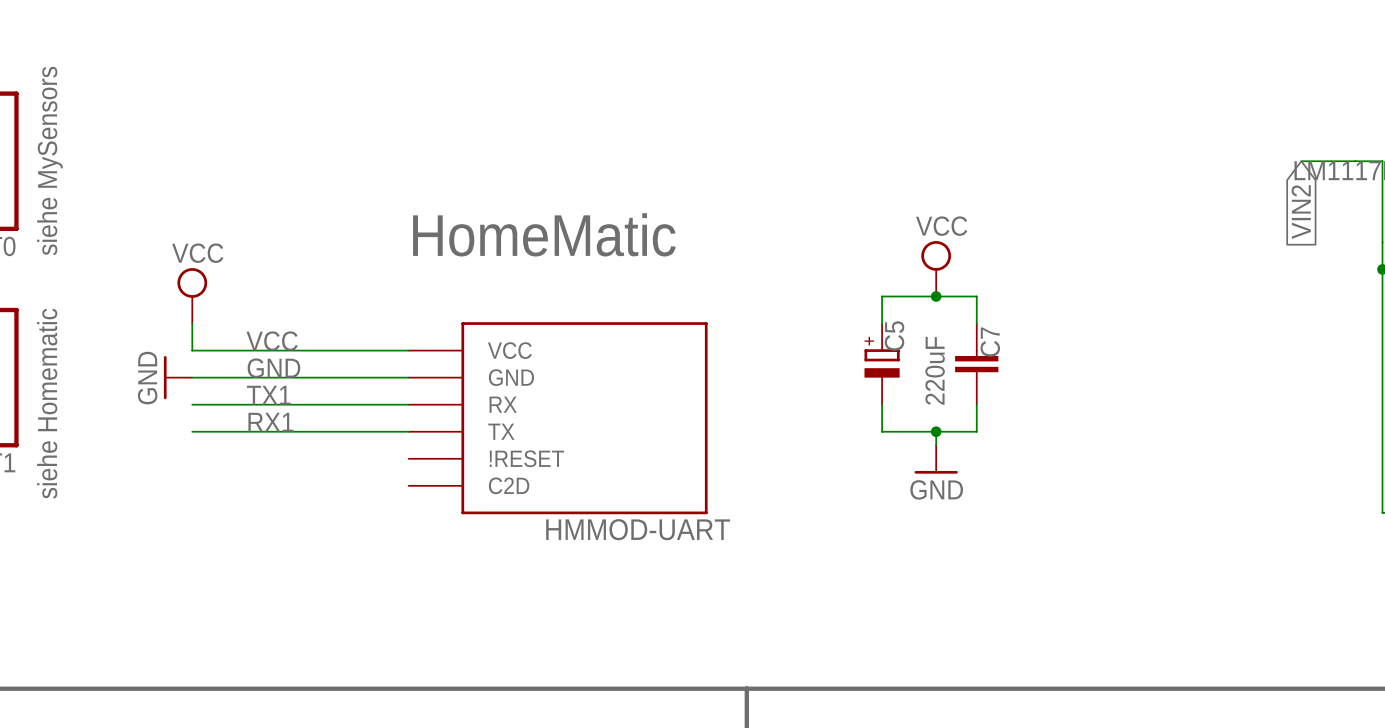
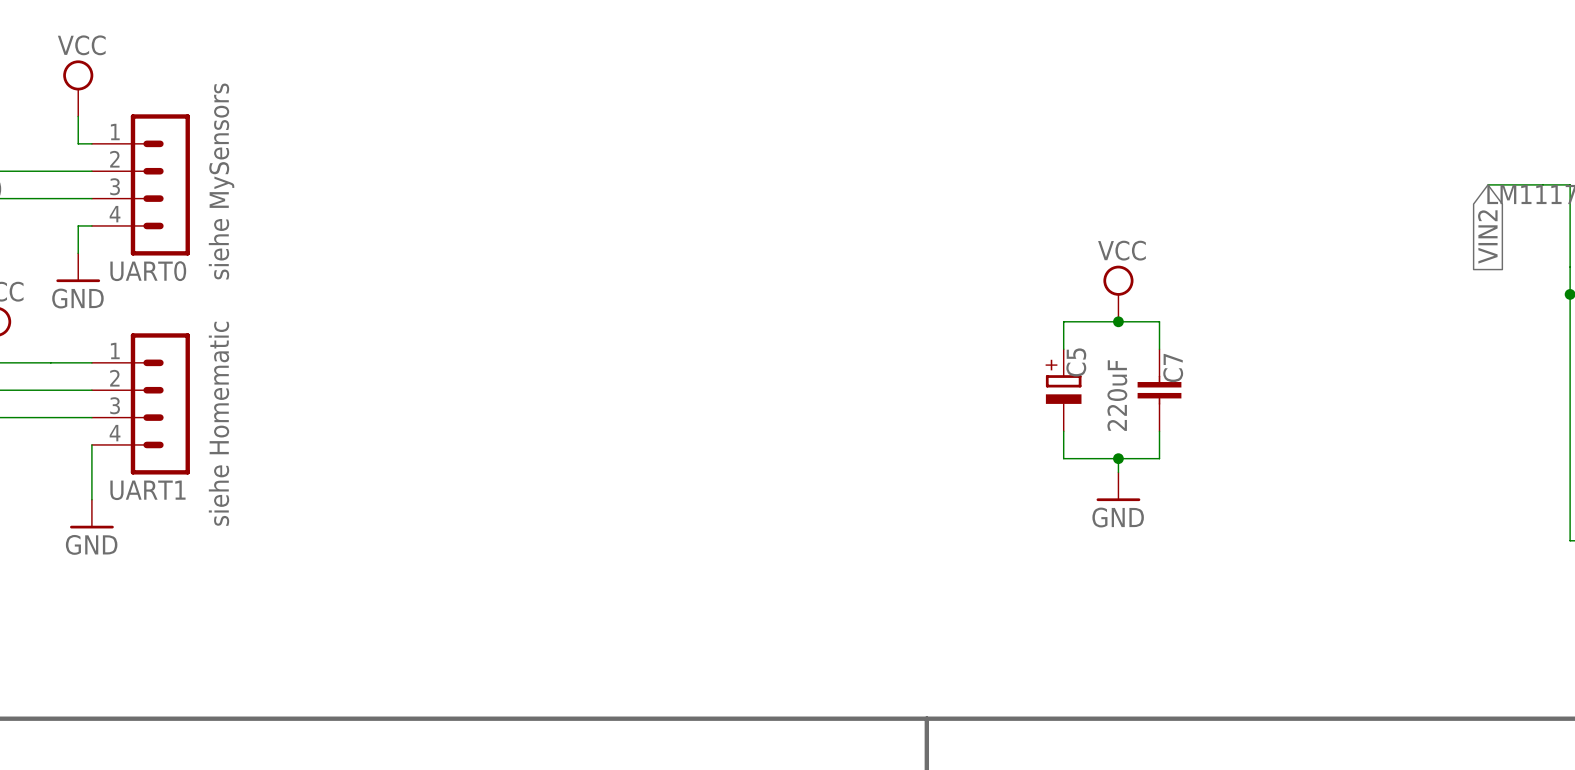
text: HomeMatic (544, 234) -> none
power symbol: VCC (192, 295) -> none
wire: (192, 323) (192, 350) (408, 350) -> none
label: VCC (272, 341) -> none
label: GND (273, 368) -> none
power symbol: GND (178, 377) -> none
wire: (192, 377) (408, 377) -> none
label: TX1 (268, 395) -> none
wire: (192, 404) (408, 404) -> none
HMMOD-UART: (558, 418) -> none
label: RX1 (270, 422) -> none
wire: (192, 431) (408, 431) -> none

